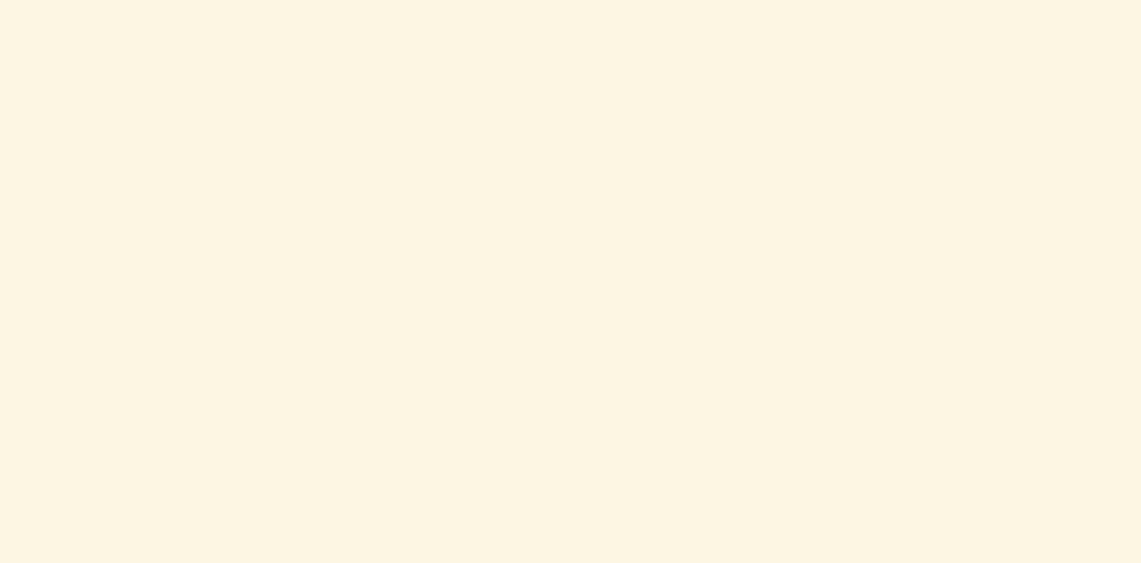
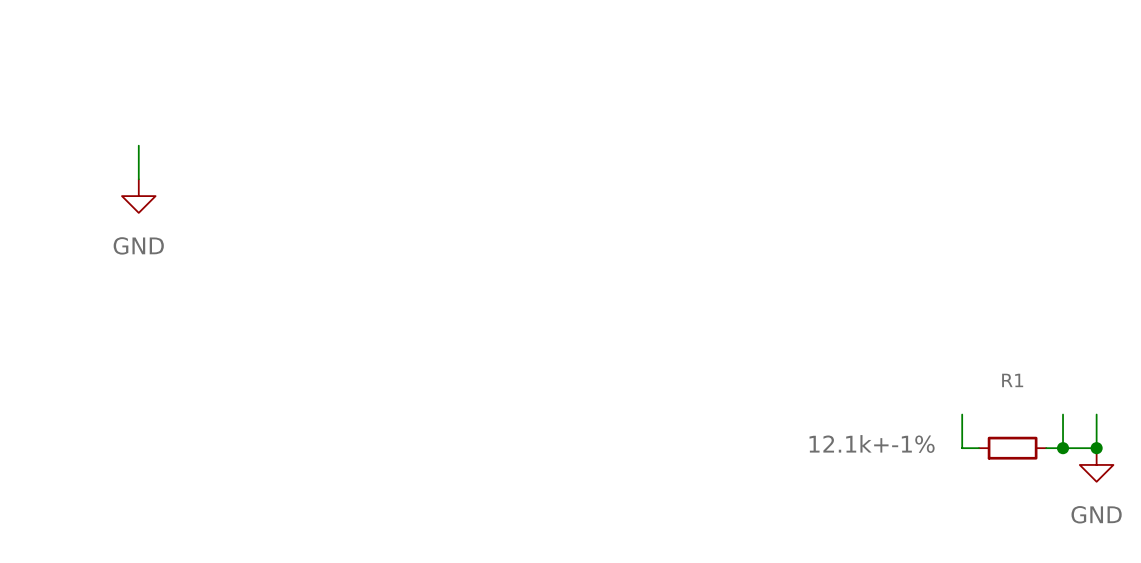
wire: none -> (138, 145) (138, 179)
power symbol: none -> GND (138, 196)
wire: none -> (962, 414) (962, 448) (978, 448)
wire: none -> (1063, 414) (1063, 448)
wire: none -> (1096, 414) (1096, 448) (1046, 448)
R1: none -> 12.1k+-1% (1012, 448)
junction: none -> (1063, 448)
junction: none -> (1096, 448)
power symbol: none -> GND (1096, 464)

